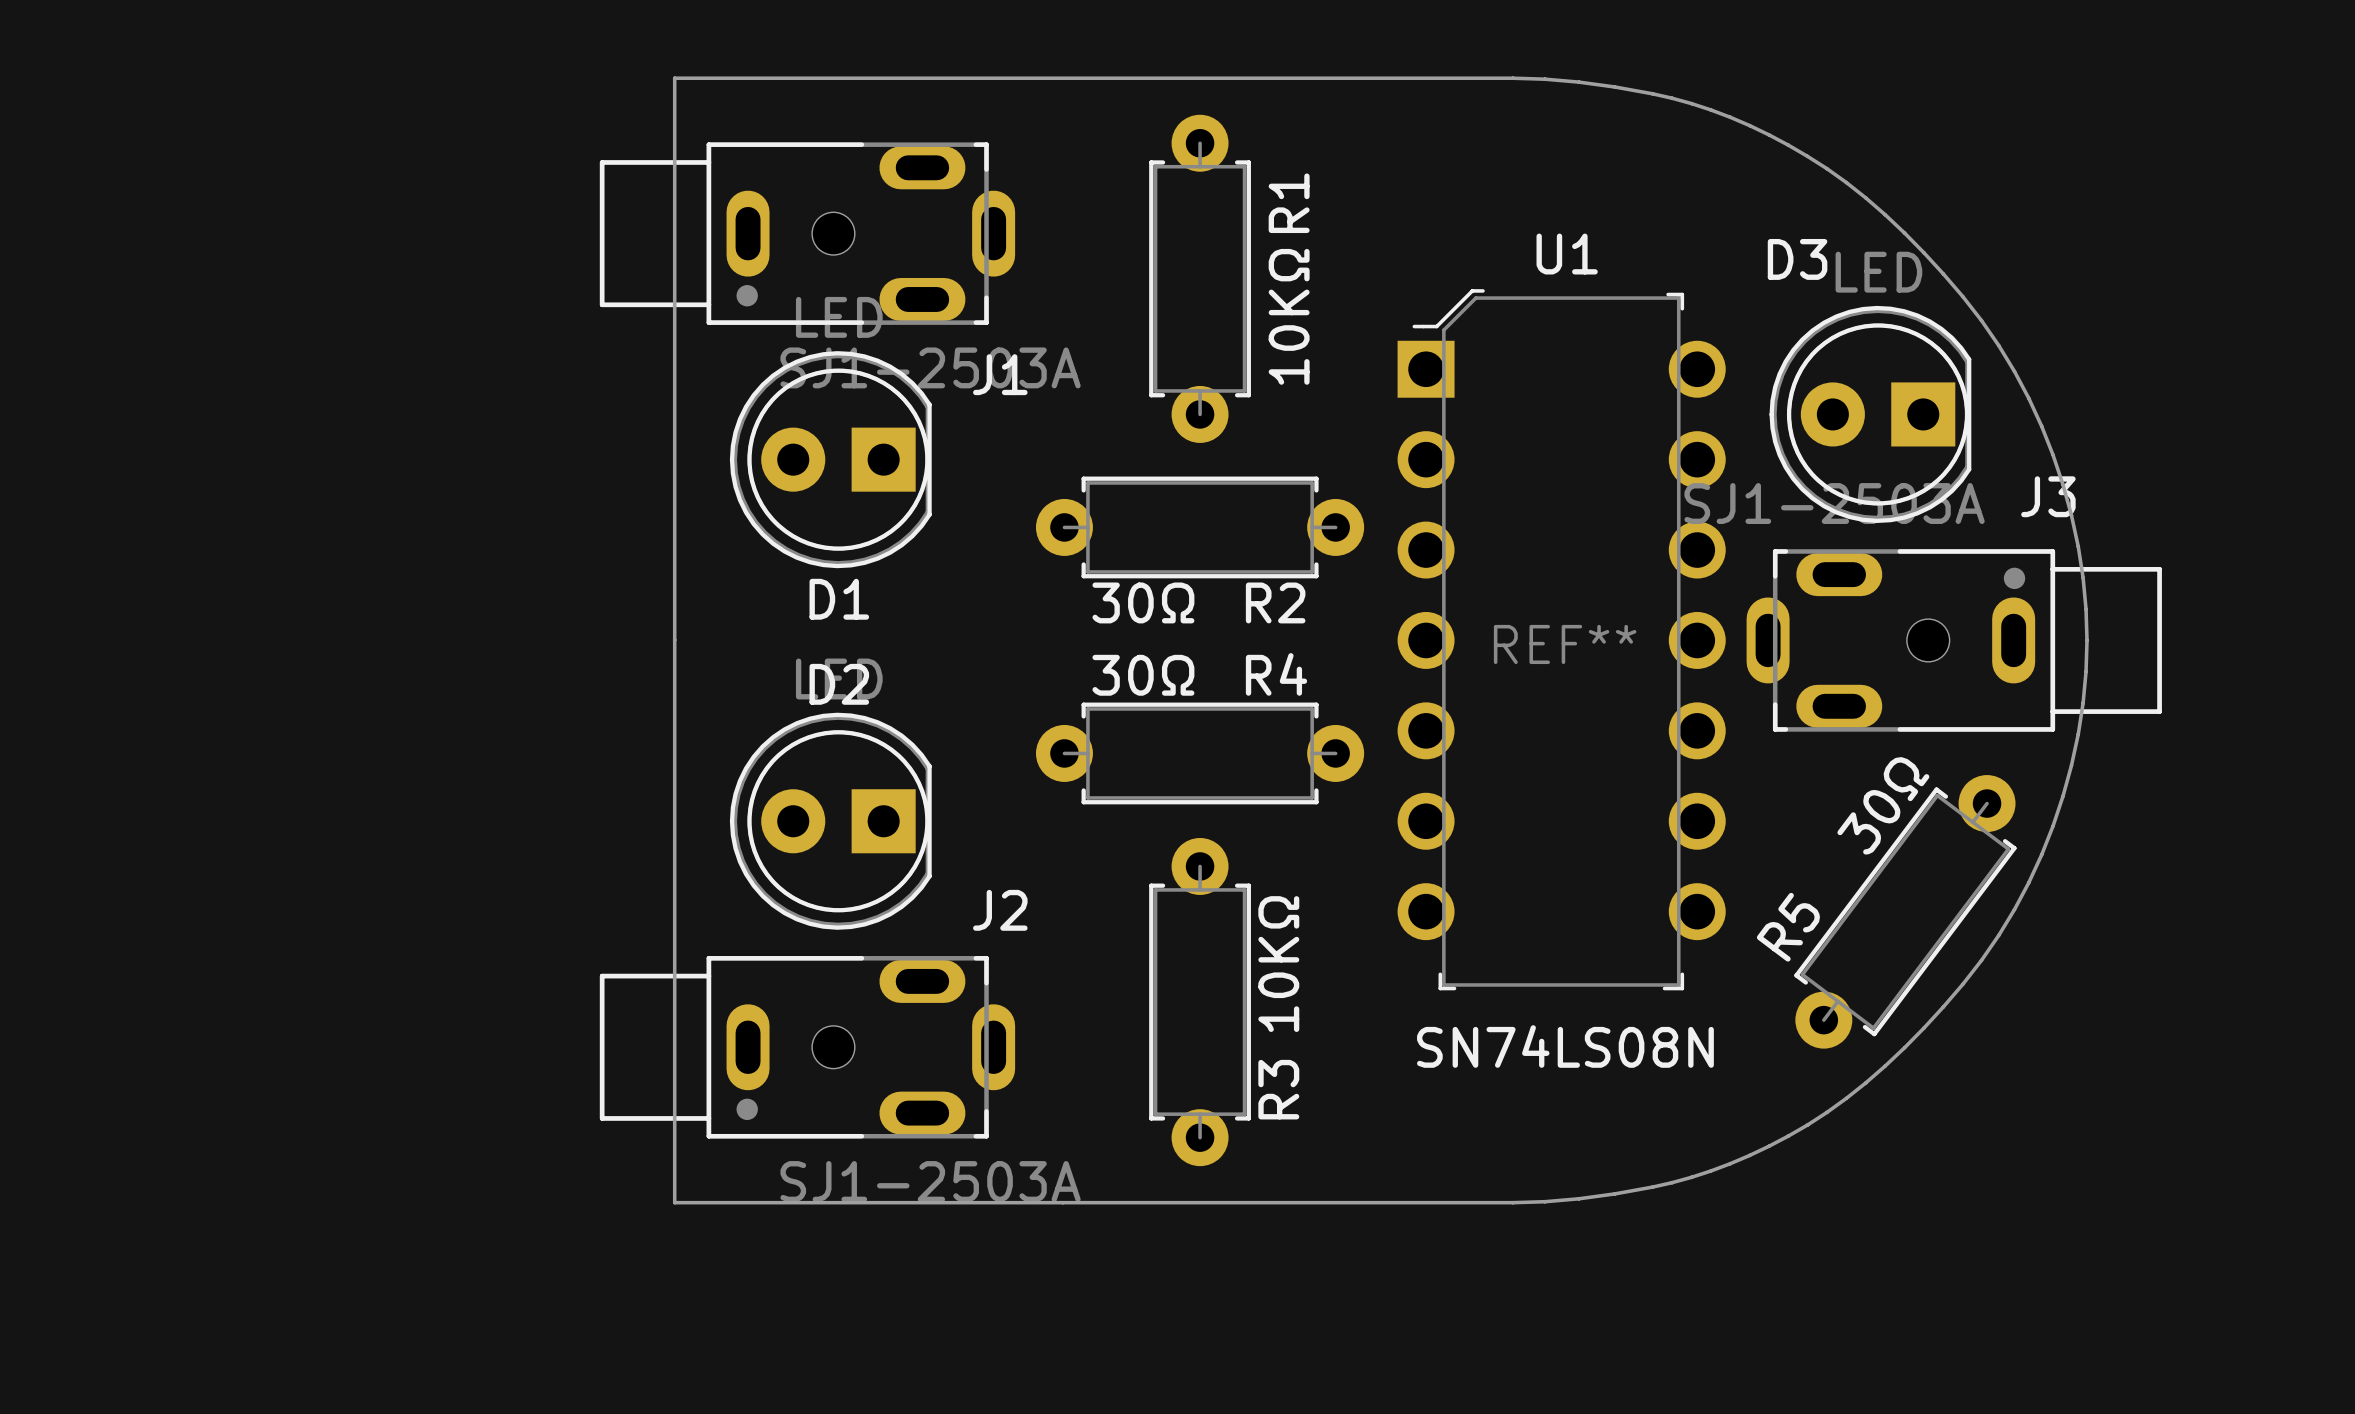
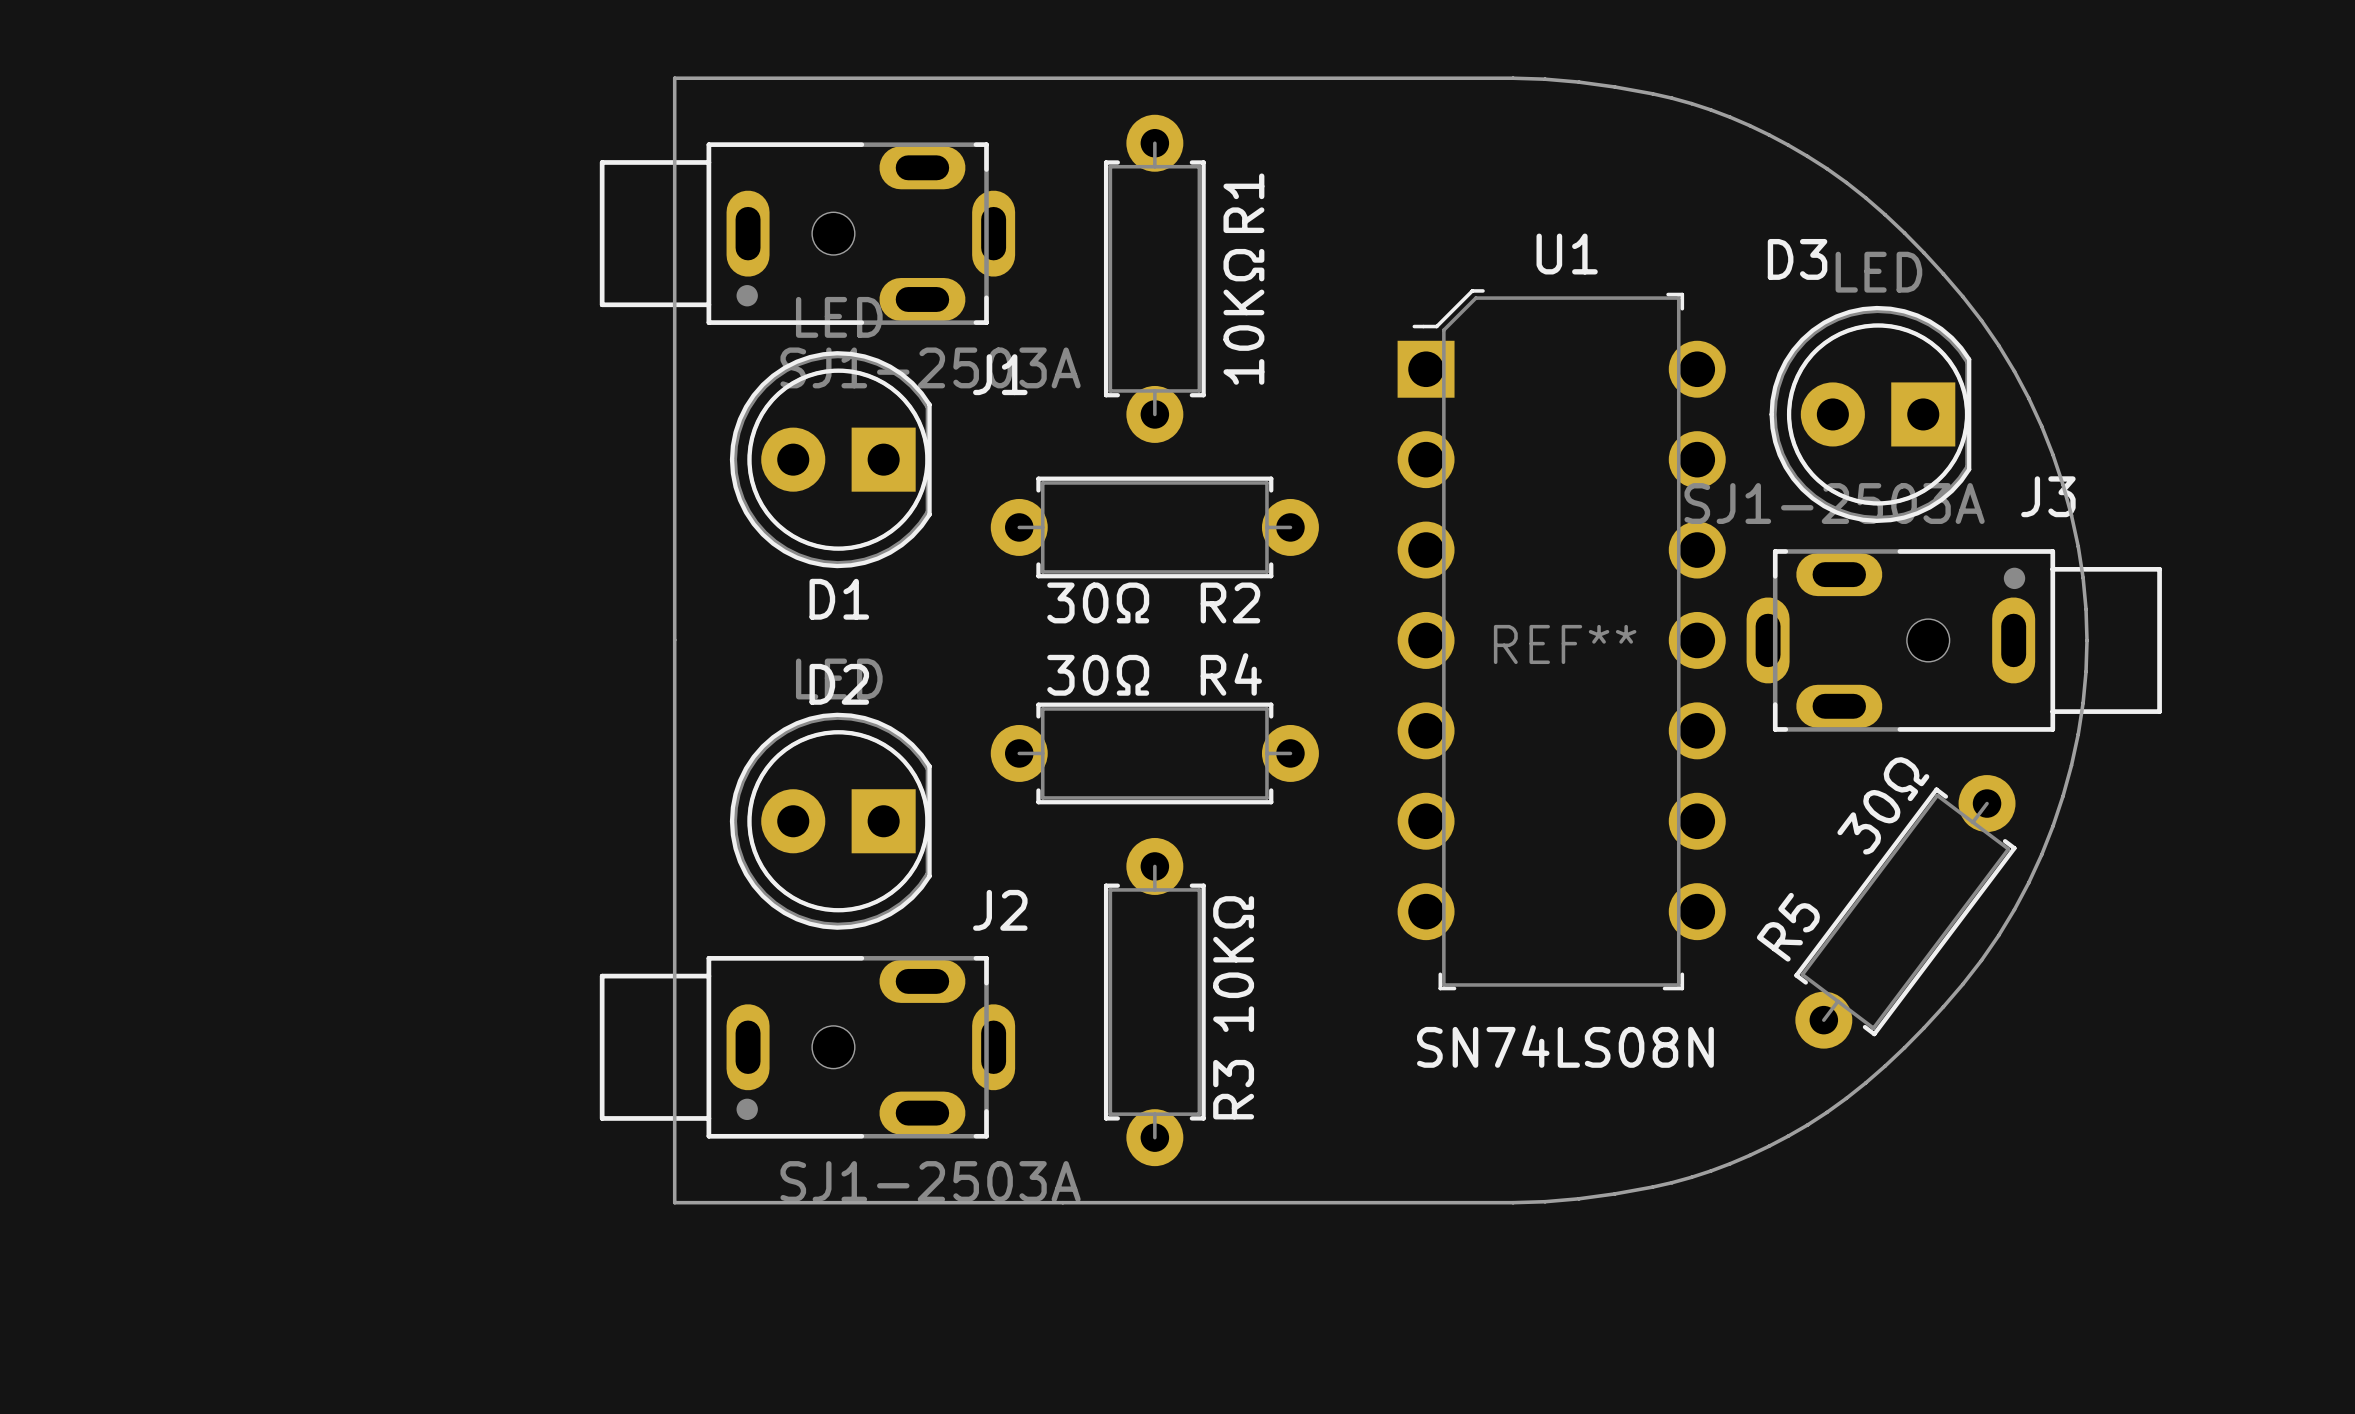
R1 position: (1200, 278) -> (1154, 278)
R2 position: (1200, 527) -> (1154, 527)
R4 position: (1200, 753) -> (1154, 753)
R3 position: (1200, 1002) -> (1154, 1002)

